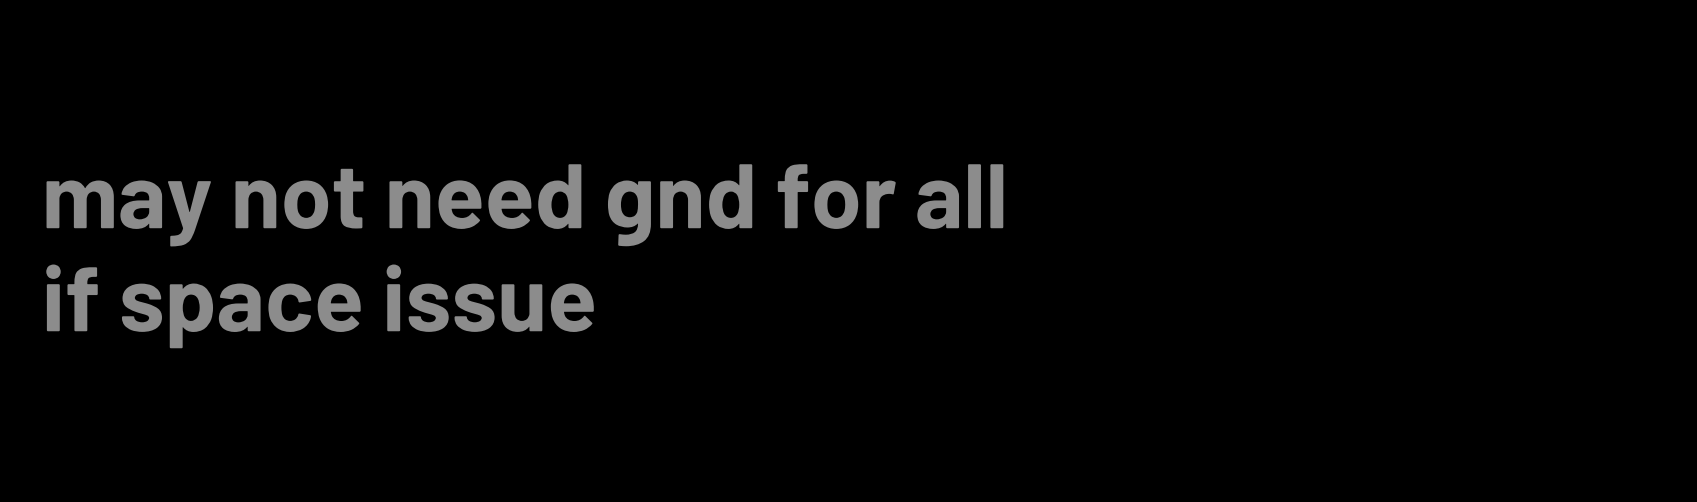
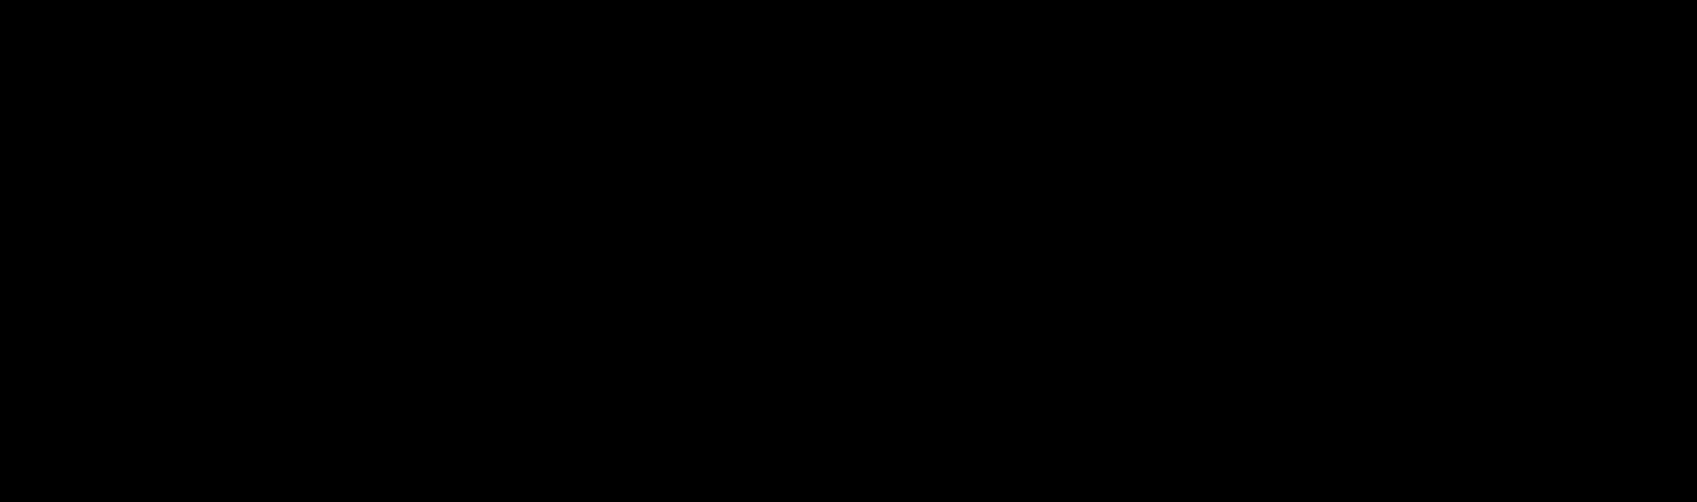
text: may not need gnd for all (524, 205) -> none
text: if space issue (320, 306) -> none

